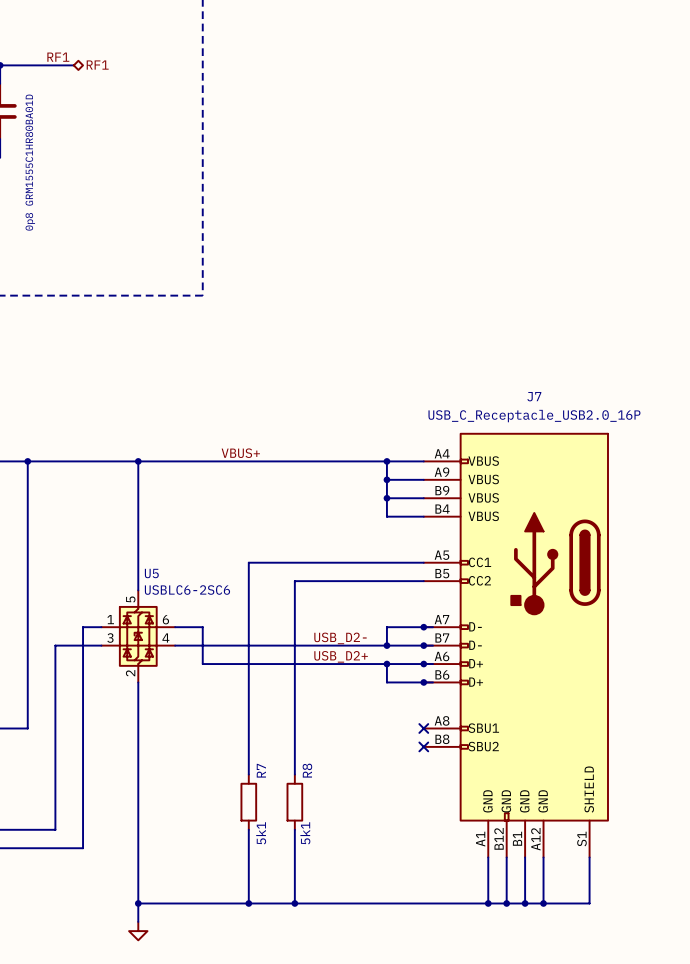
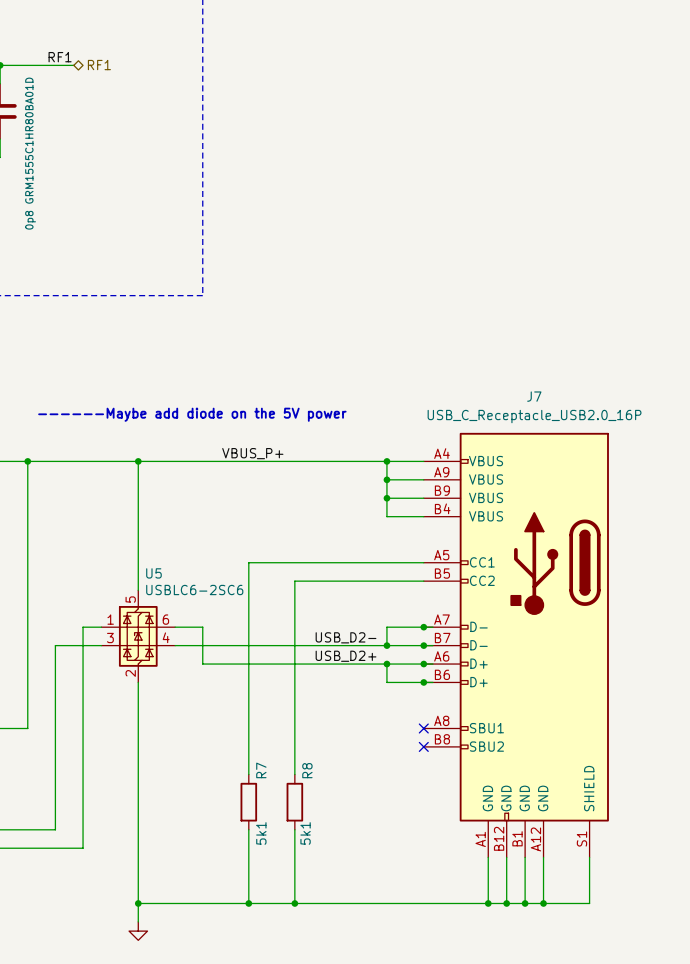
text: none -> ------Maybe add diode on the 5V power (192, 414)
label: VBUS+ (240, 453) -> VBUS_P+ (252, 453)

